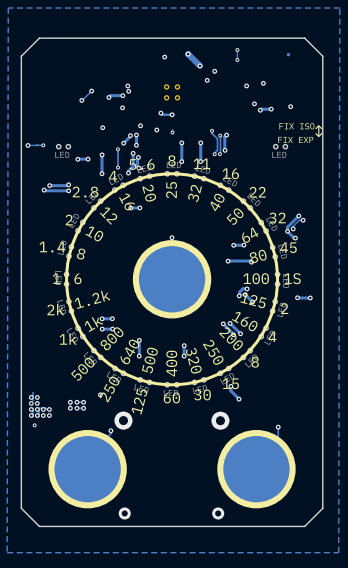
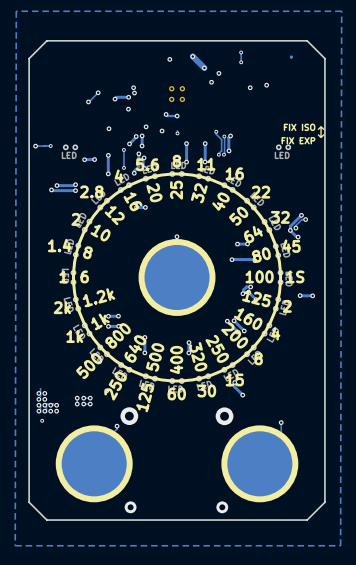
via: (254, 103) -> none
via: (290, 106) -> none
track: (271, 109) (260, 110) -> none
via: (271, 109) -> none
via: (260, 110) -> none

